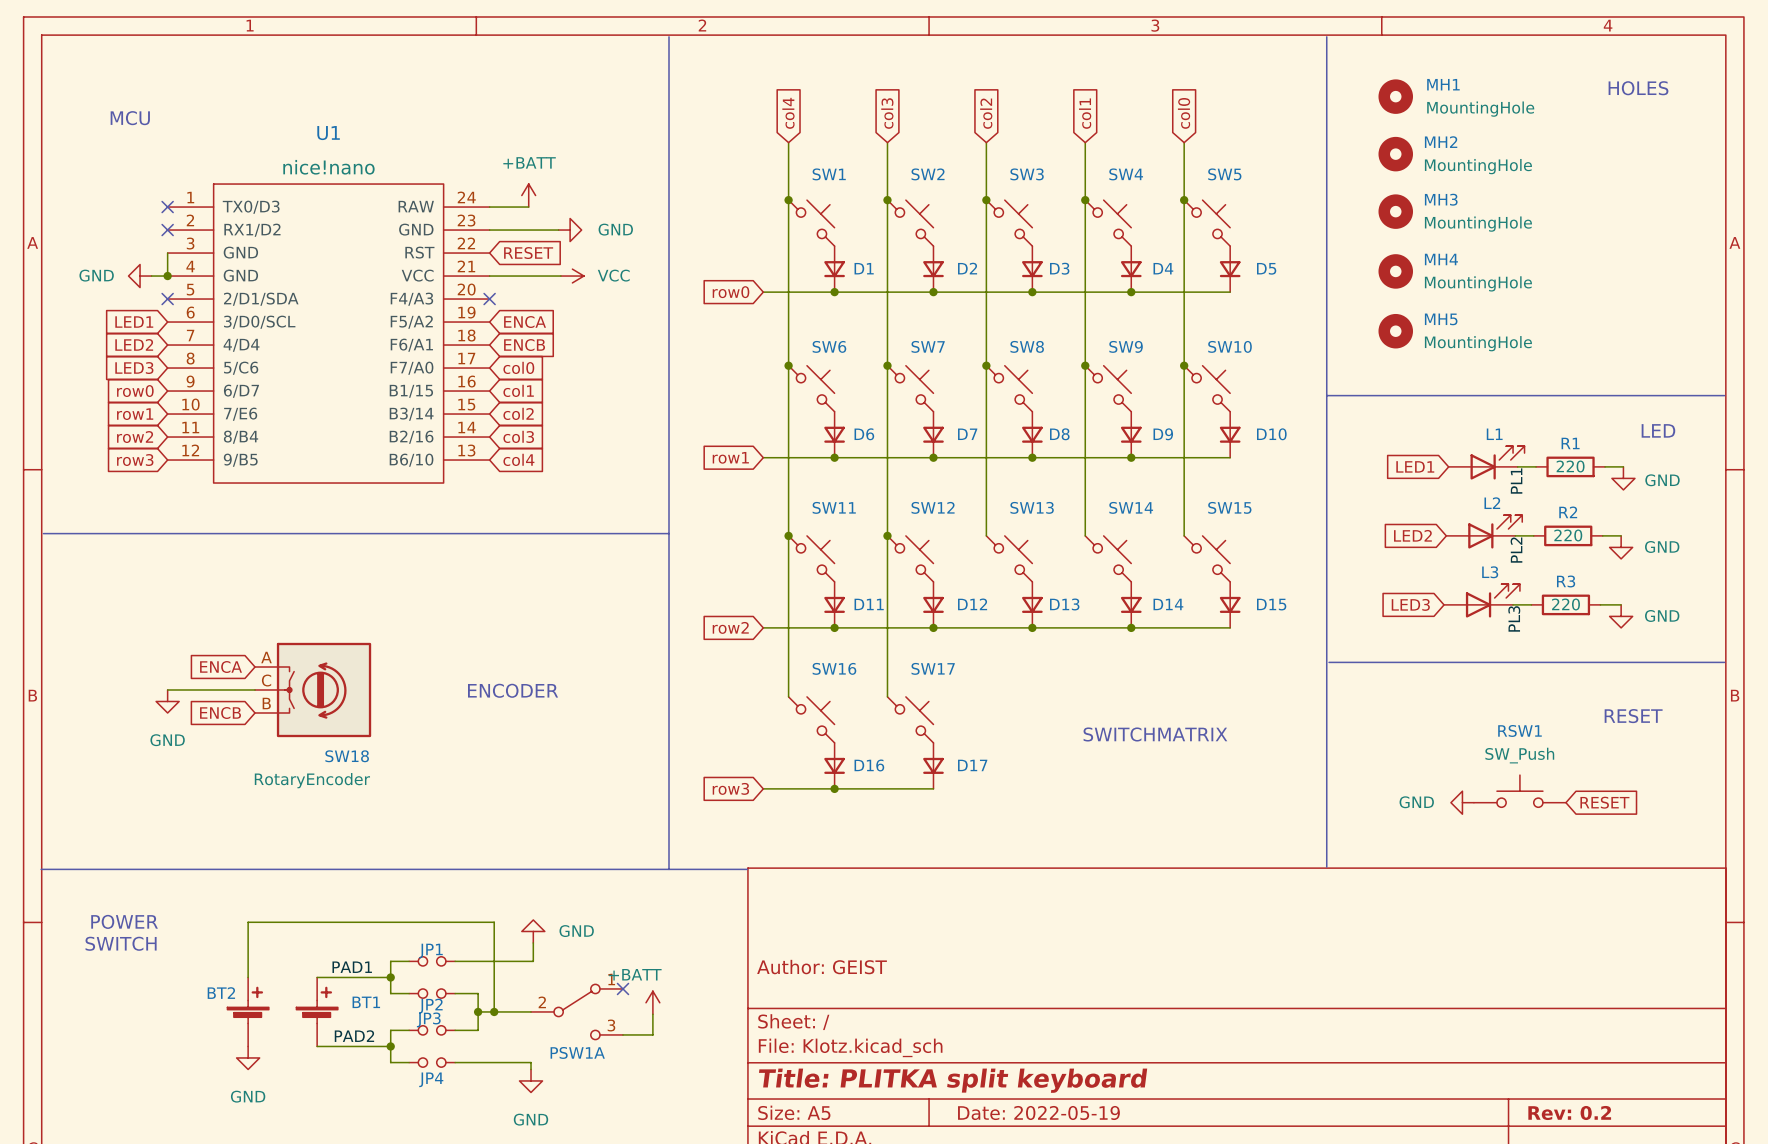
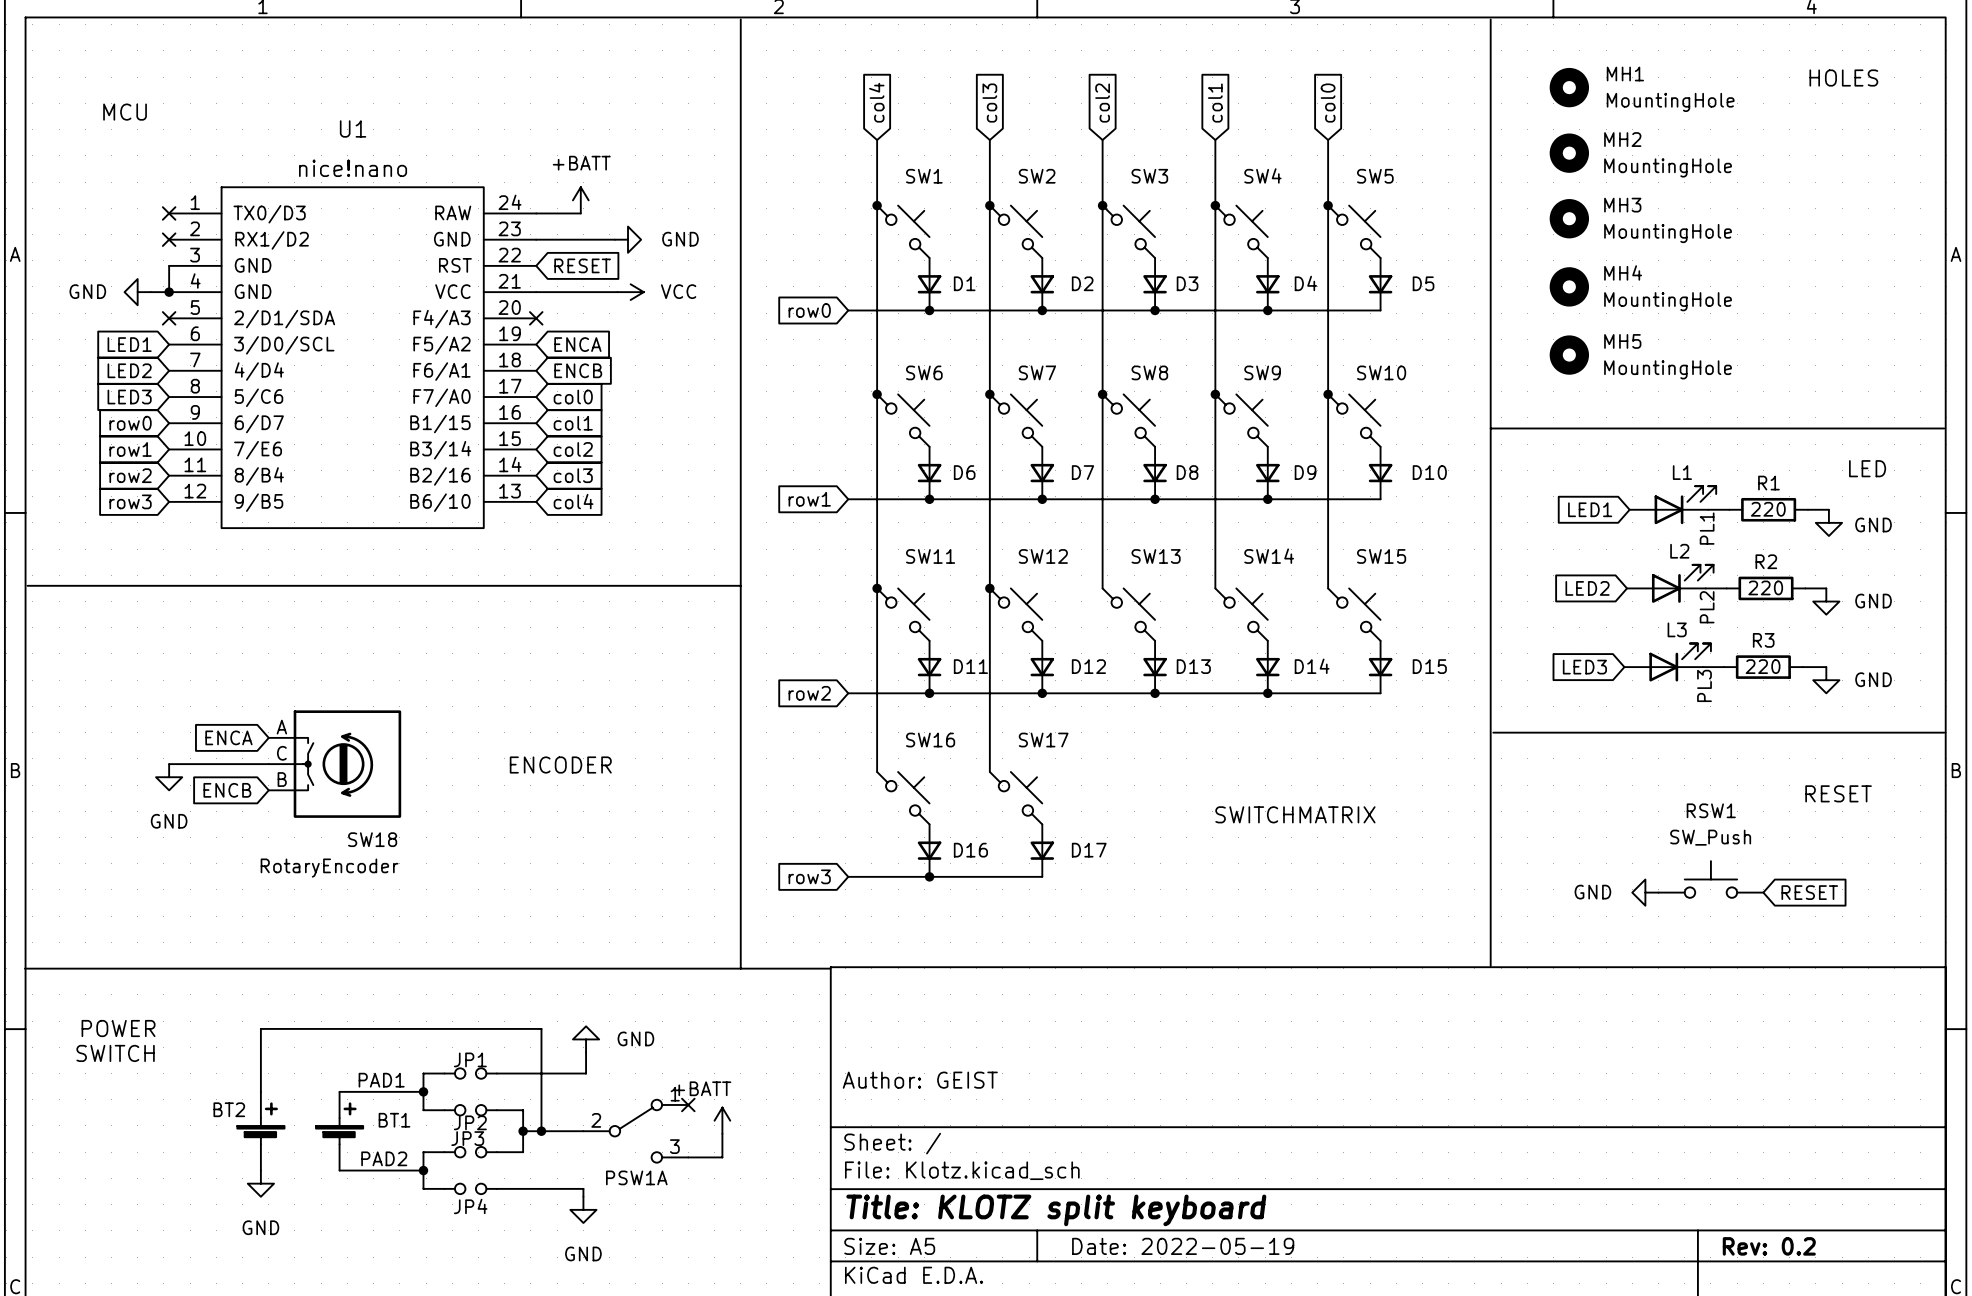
title block: Title: PLITKA split keyboard (953, 1080) -> Title: KLOTZ split keyboard (1056, 1210)

